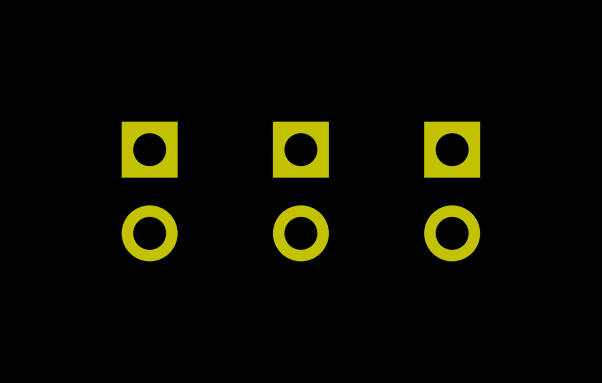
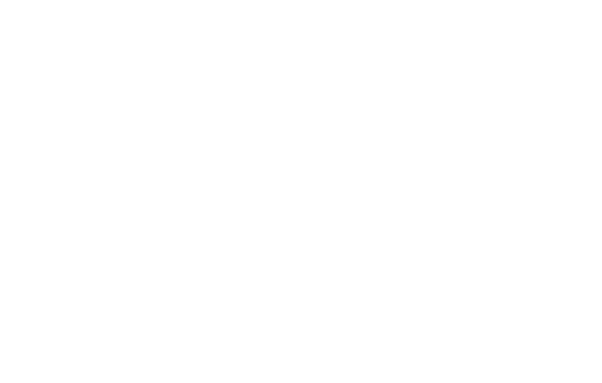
part: (149, 191) -> none
part: (300, 191) -> none
part: (452, 191) -> none

